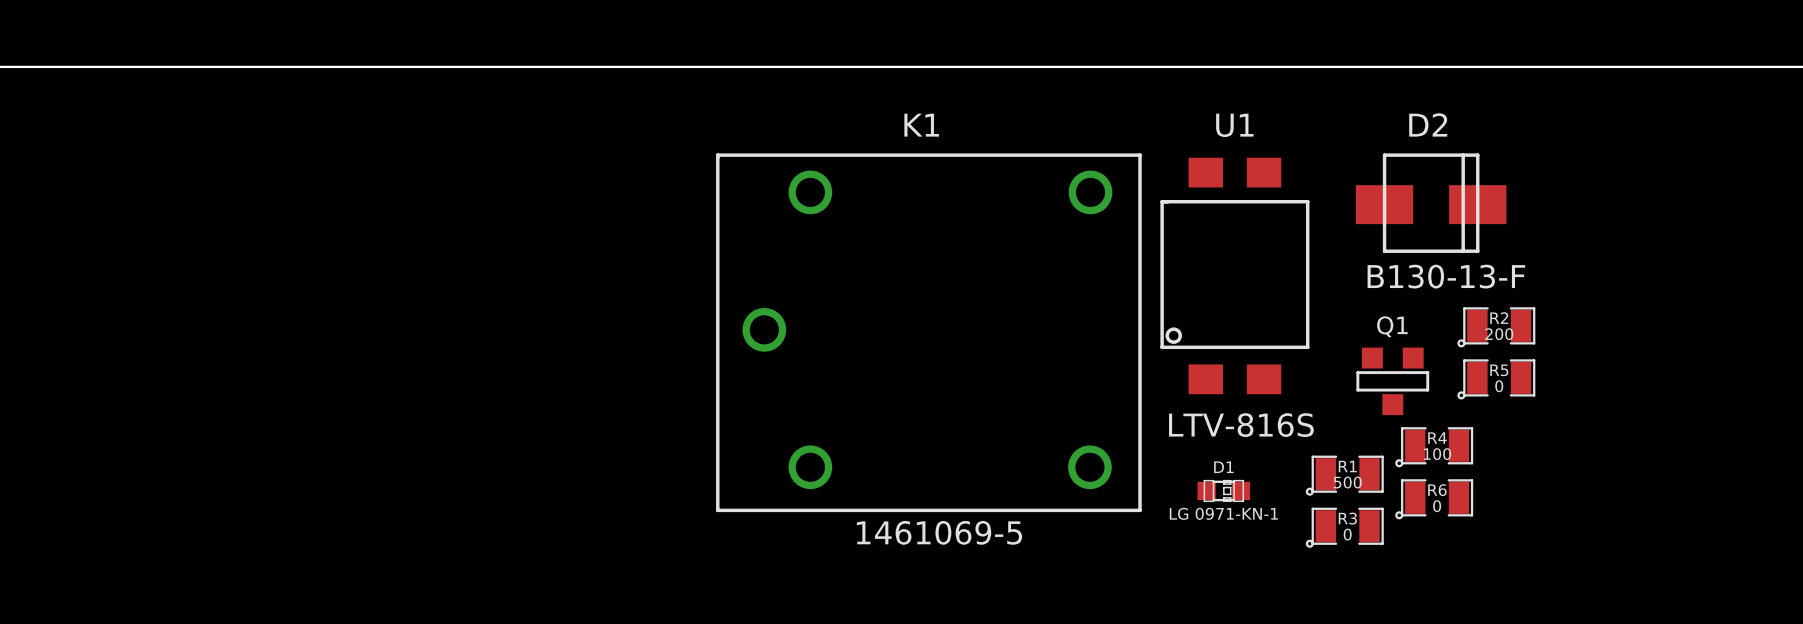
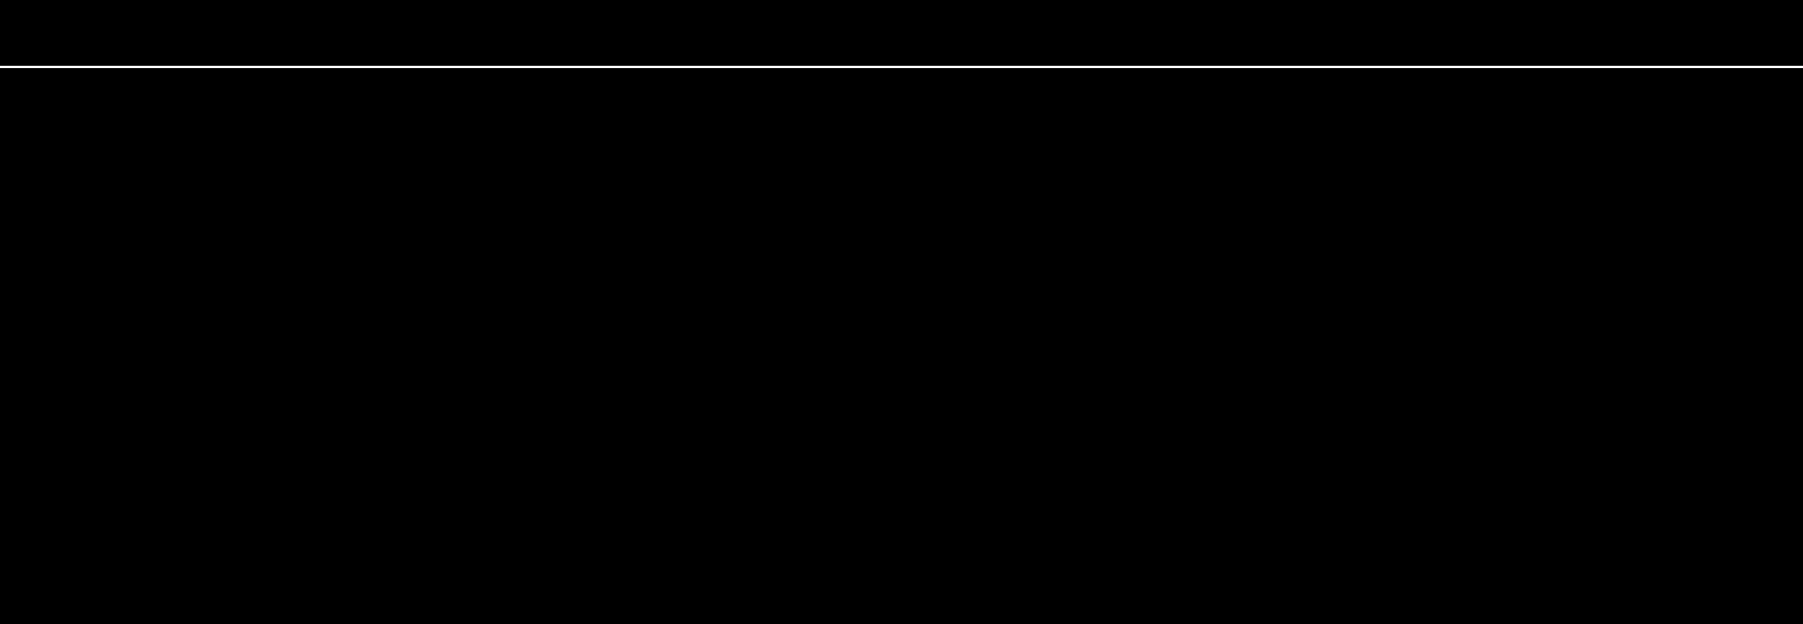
D2: B130-13-F (1431, 203) -> none
U1: LTV-816S (1234, 275) -> none
R2: 200 (1496, 327) -> none
K1: 1461069-5 (928, 332) -> none
R5: 0 (1496, 379) -> none
Q1: (1392, 381) -> none
R4: 100 (1434, 447) -> none
R1: 500 (1344, 475) -> none
D1: LG 0971-KN-1 (1223, 490) -> none
R6: 0 (1434, 499) -> none
R3: 0 (1344, 527) -> none

